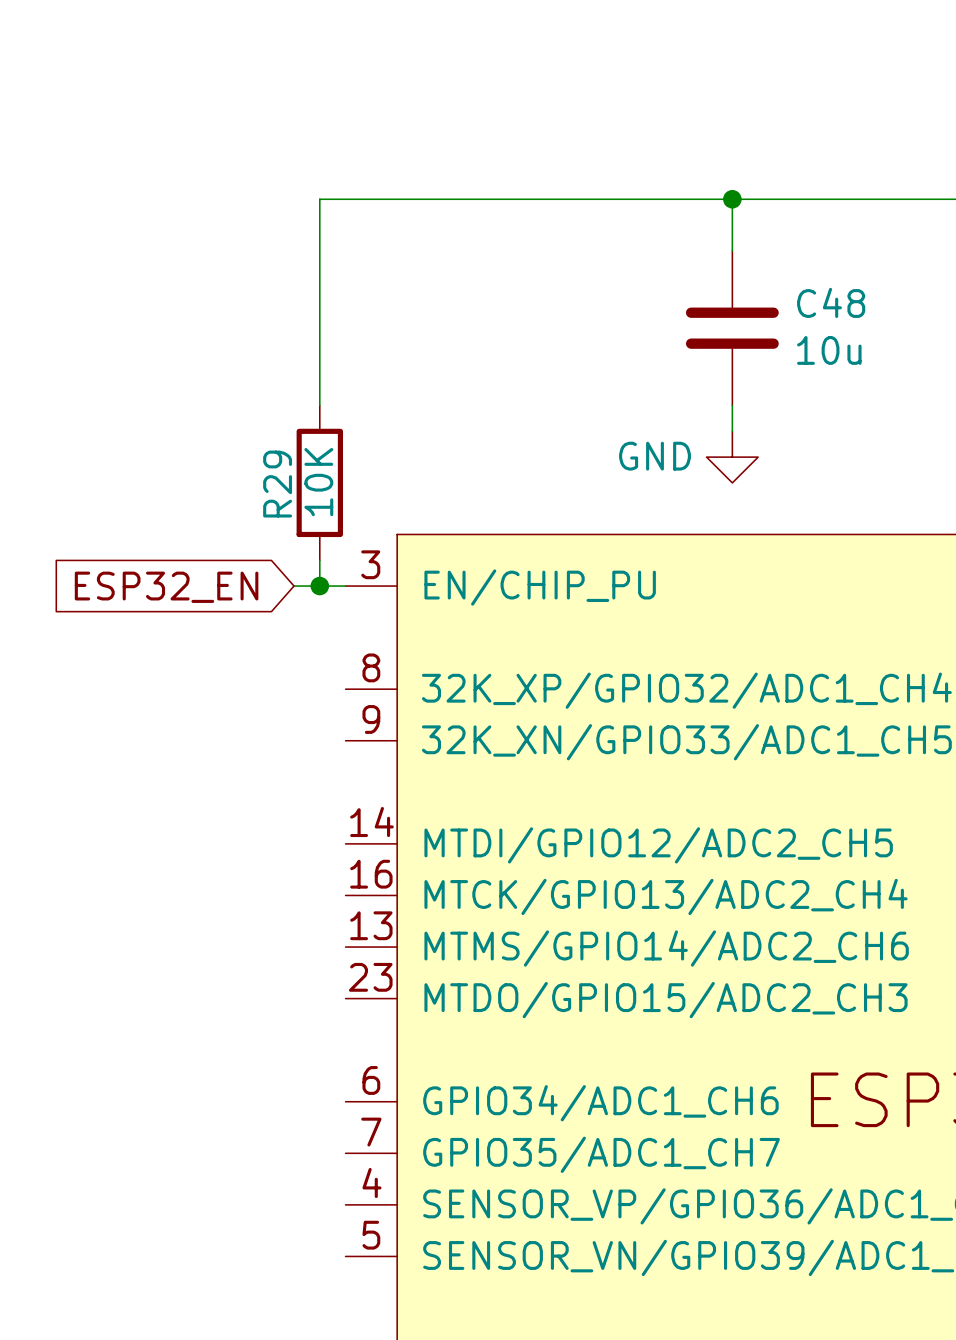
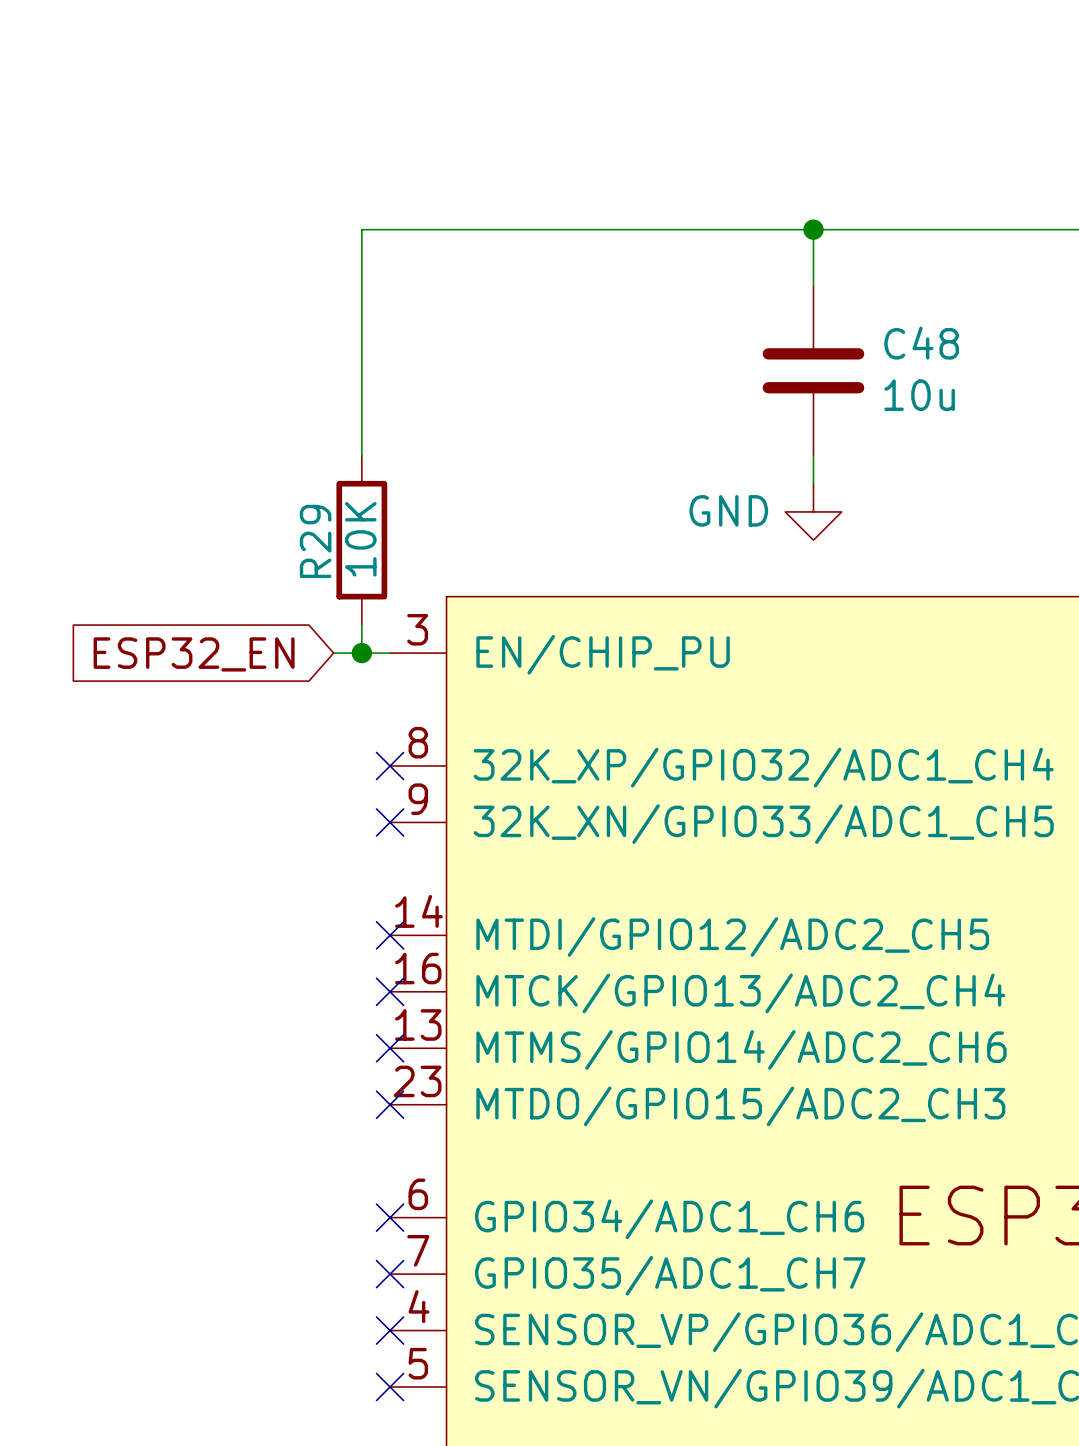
no-connect mark: none -> (390, 765)
no-connect mark: none -> (390, 822)
no-connect mark: none -> (390, 935)
no-connect mark: none -> (390, 991)
no-connect mark: none -> (390, 1048)
no-connect mark: none -> (390, 1104)
no-connect mark: none -> (390, 1217)
no-connect mark: none -> (390, 1274)
no-connect mark: none -> (390, 1330)
no-connect mark: none -> (390, 1387)

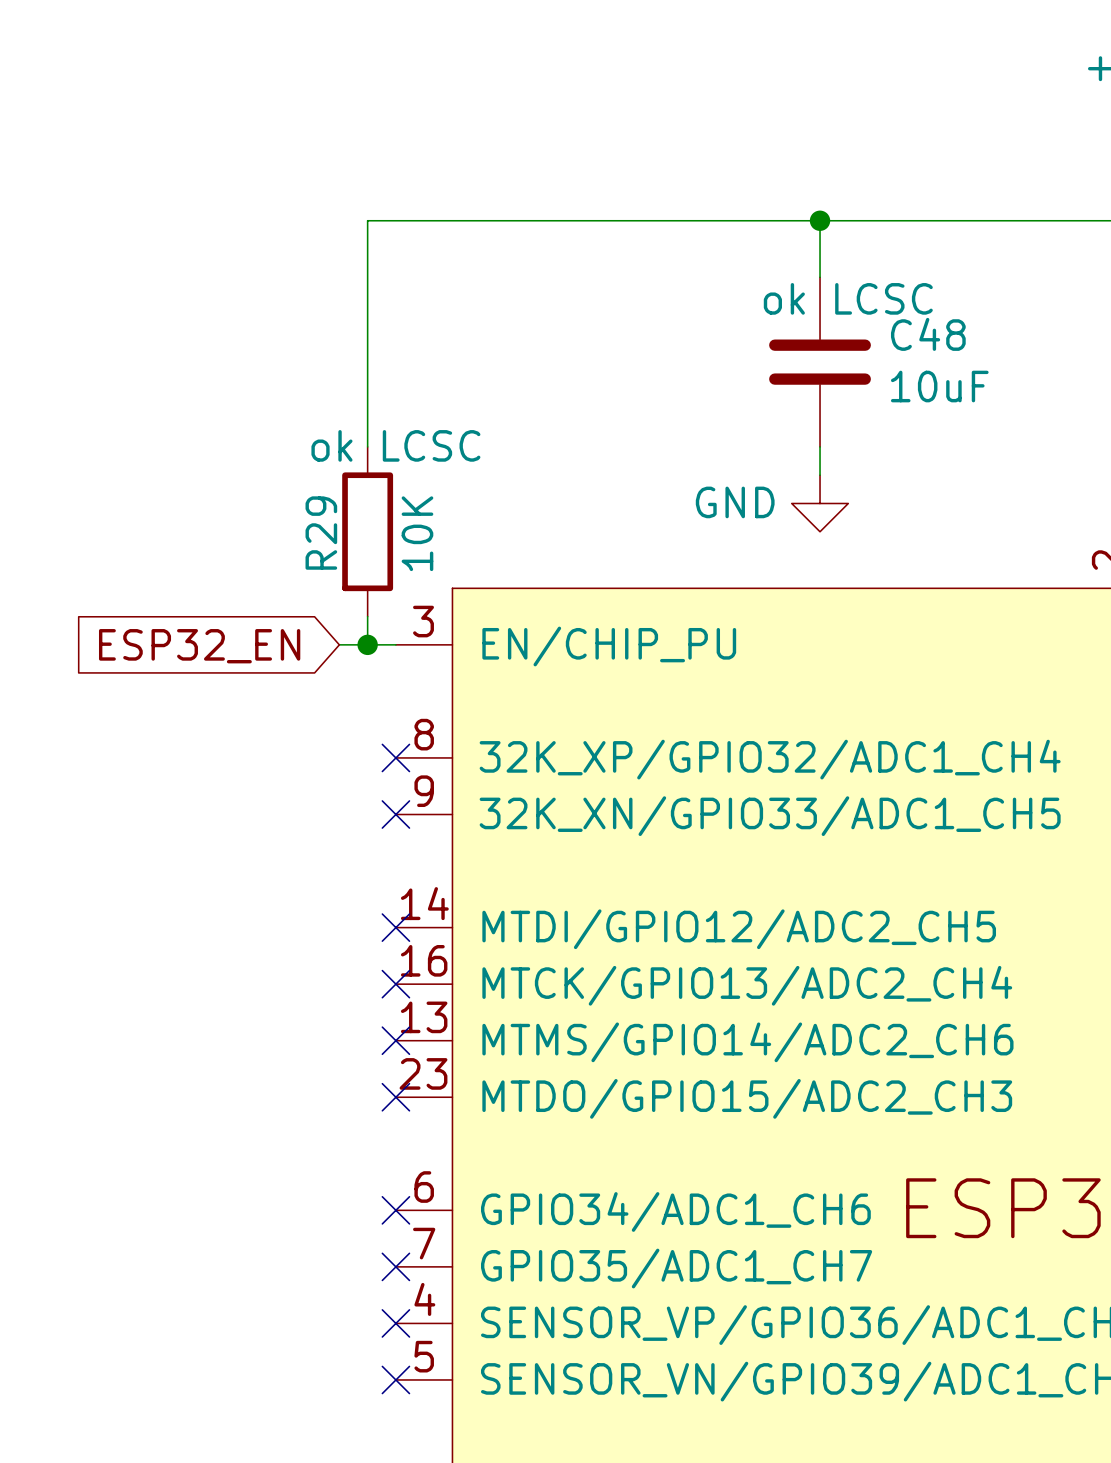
C48 text: none -> ok LCSC (848, 298)
C48 value: 10u (919, 395) -> 10uF (939, 386)
R29 text: none -> ok LCSC (395, 445)
R29 value position: 10K (360, 539) -> 10K (417, 533)

